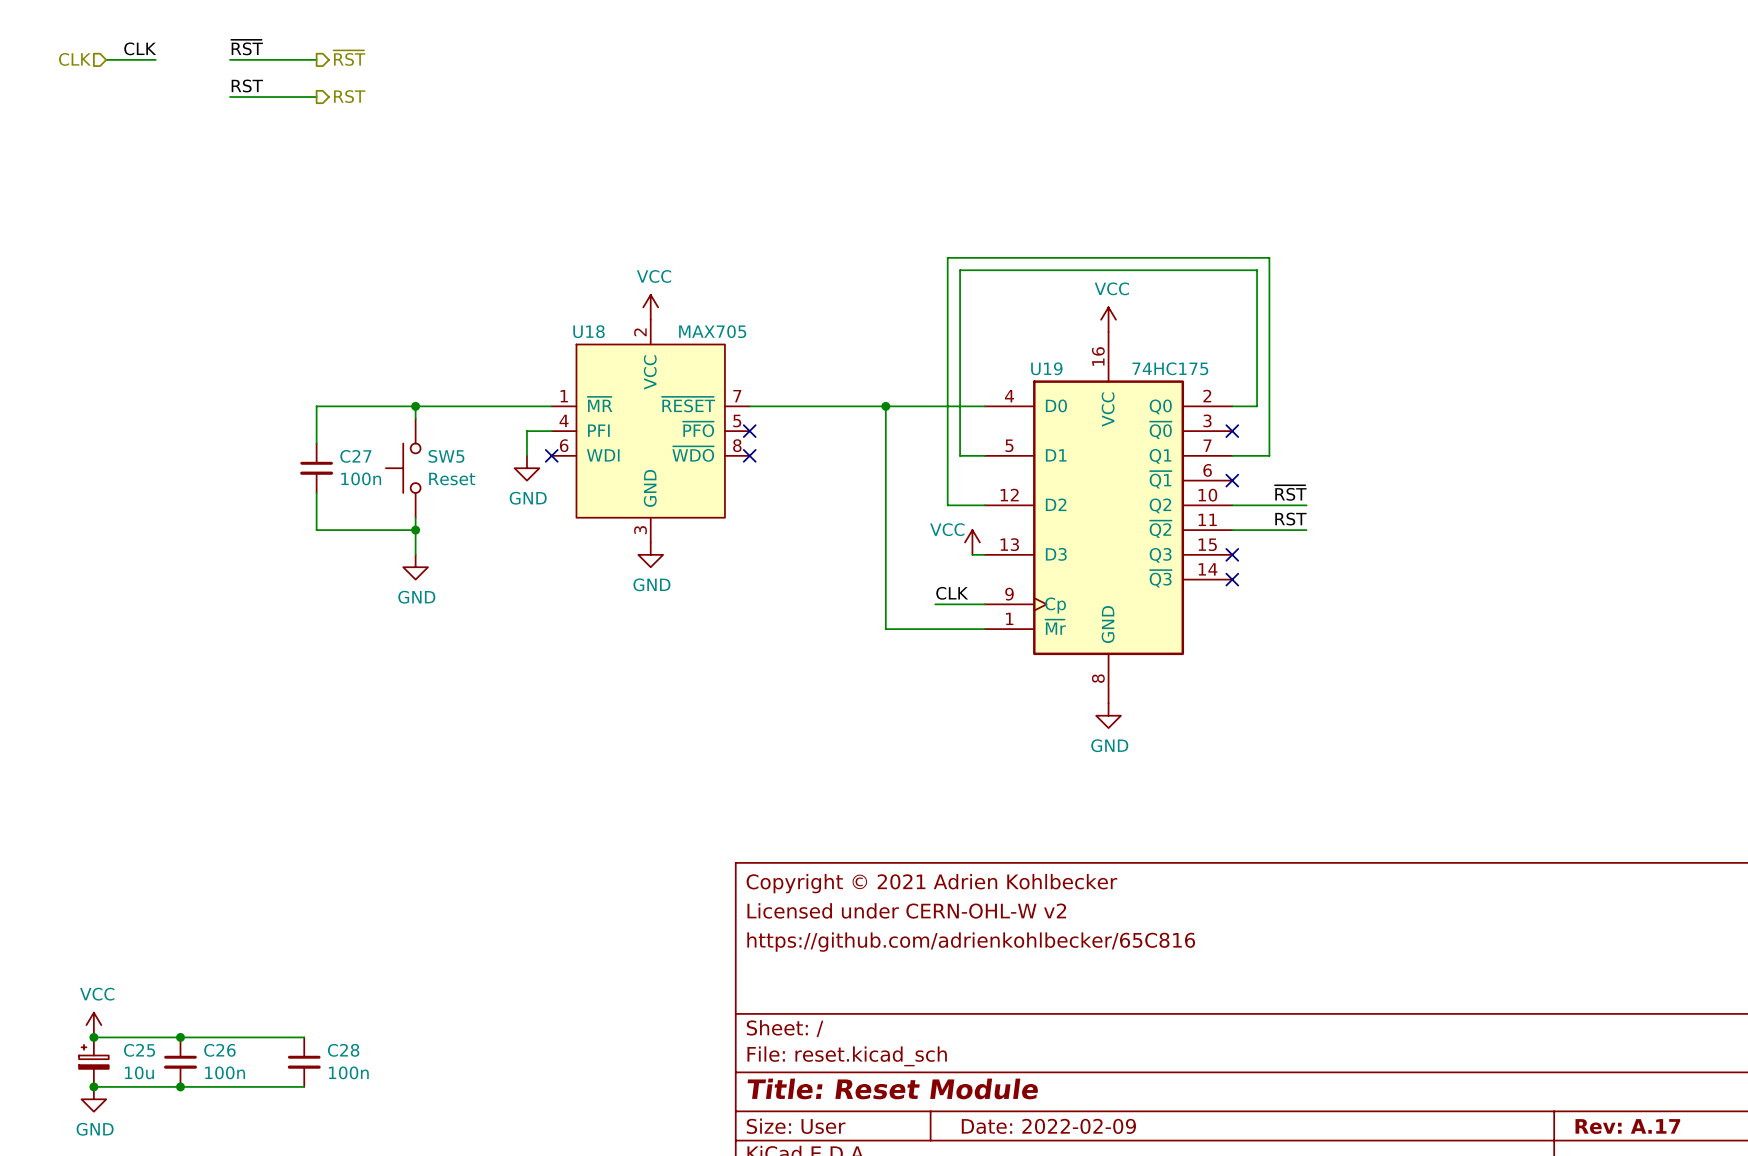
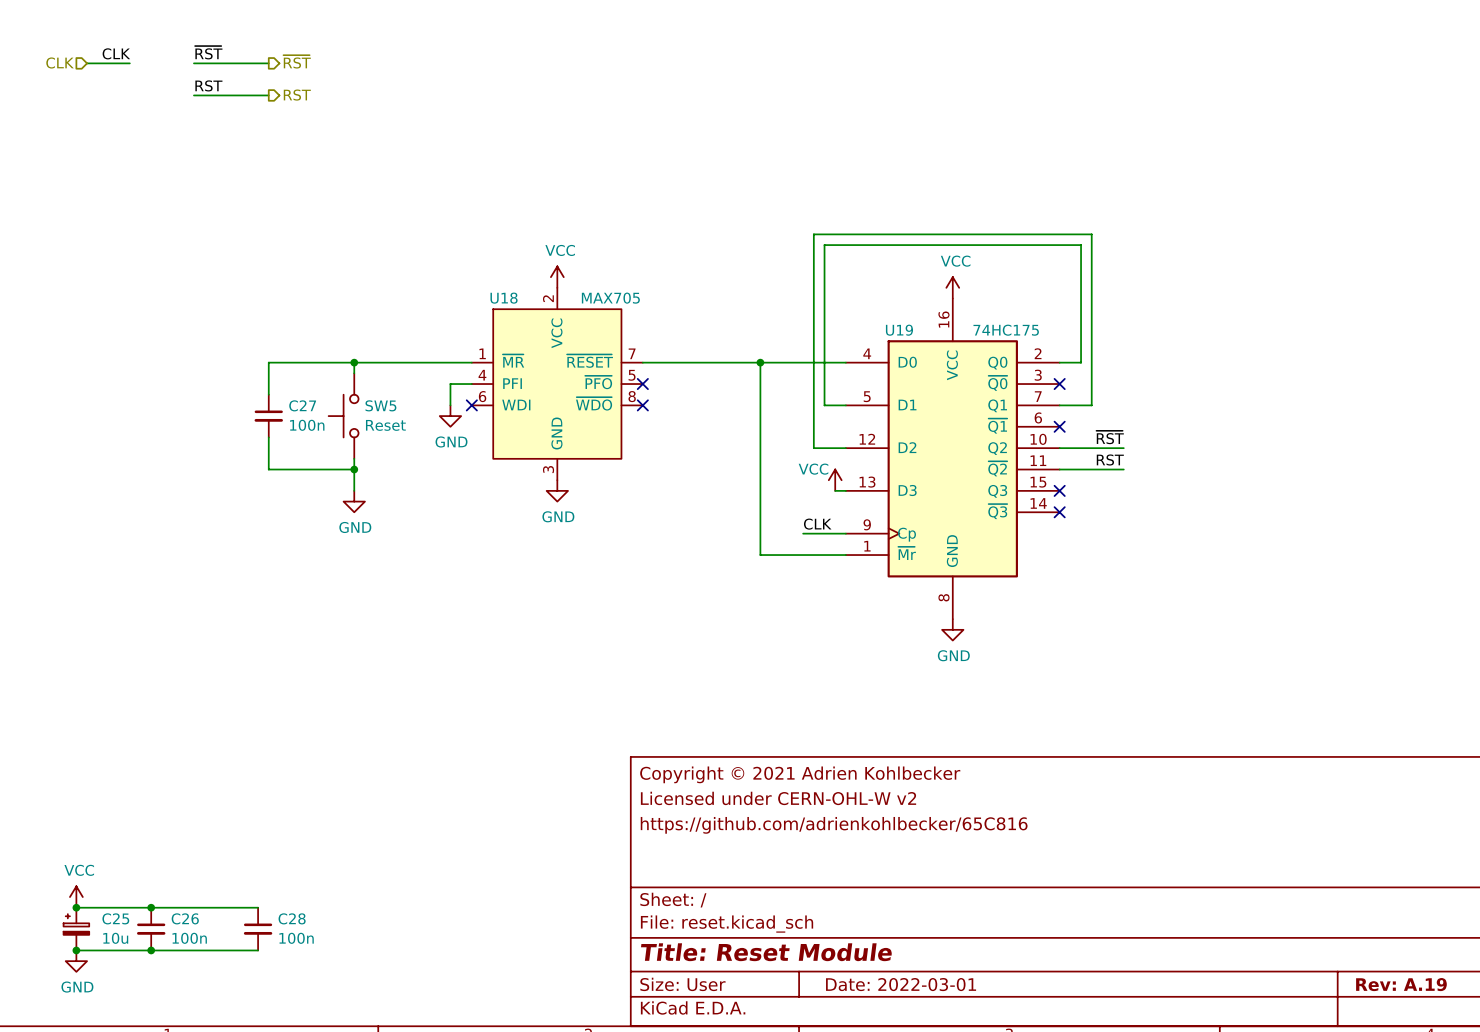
title block: Date: 2022-02-09 (1048, 1126) -> Date: 2022-03-01 (901, 984)
title block: Rev: A.17 (1627, 1126) -> Rev: A.19 (1401, 984)

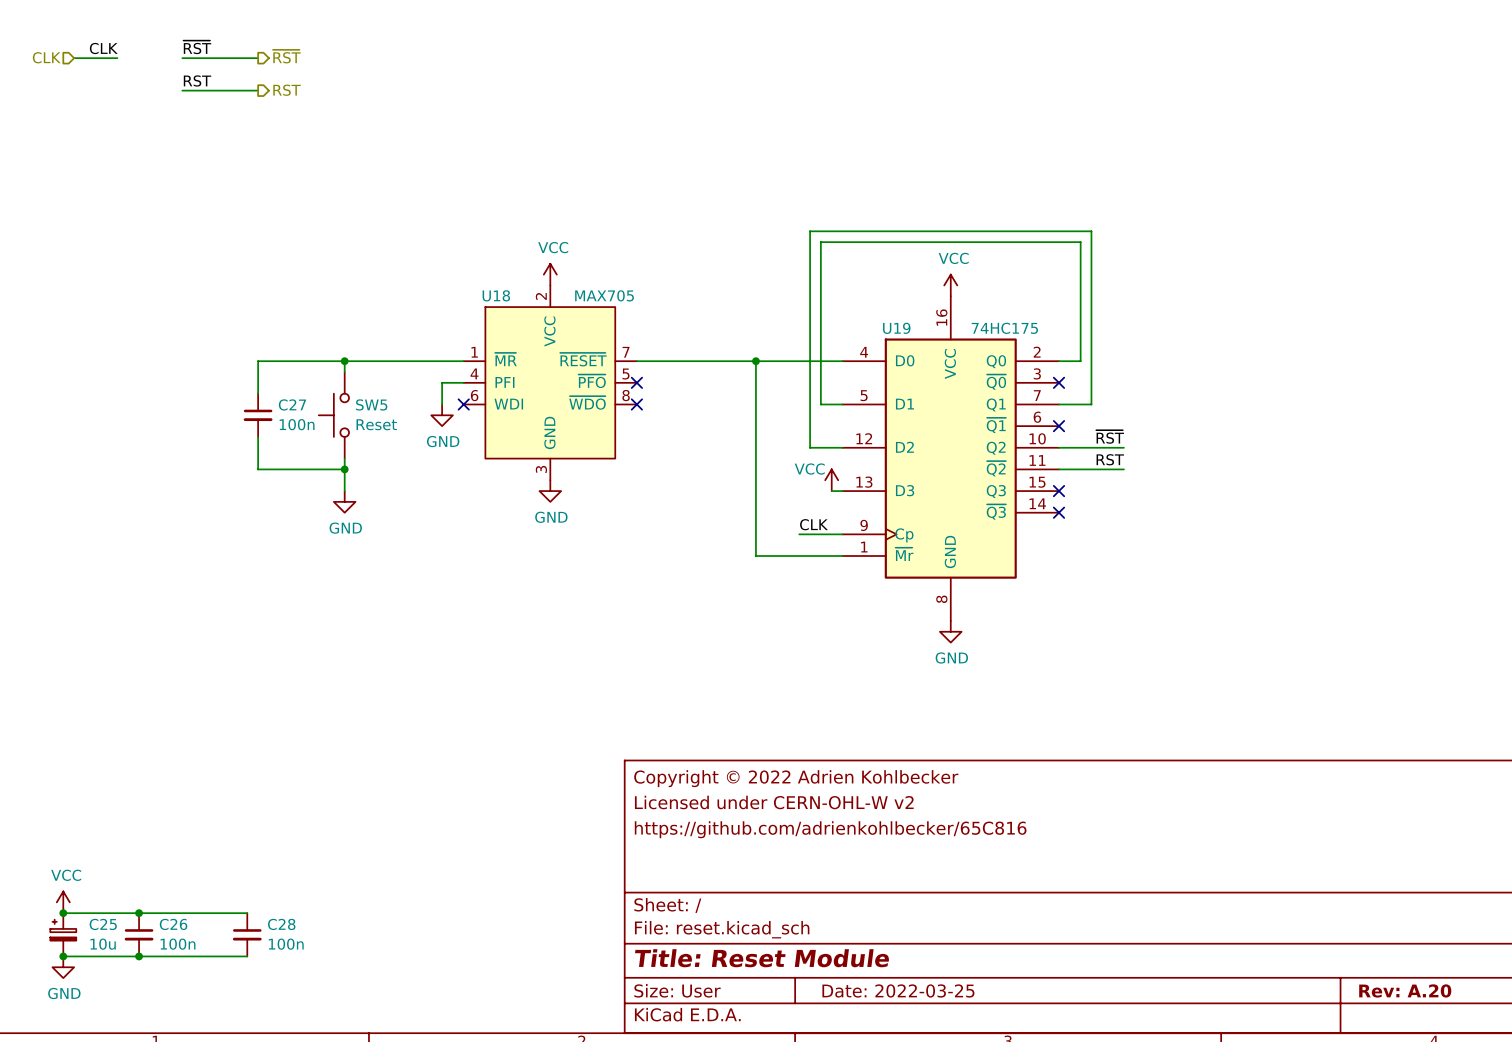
title block: Copyright © 2021 Adrien Kohlbecker (800, 774) -> Copyright © 2022 Adrien Kohlbecker (796, 778)
title block: Date: 2022-03-01 (901, 984) -> Date: 2022-03-25 (898, 990)
title block: Rev: A.19 (1401, 984) -> Rev: A.20 (1405, 990)

